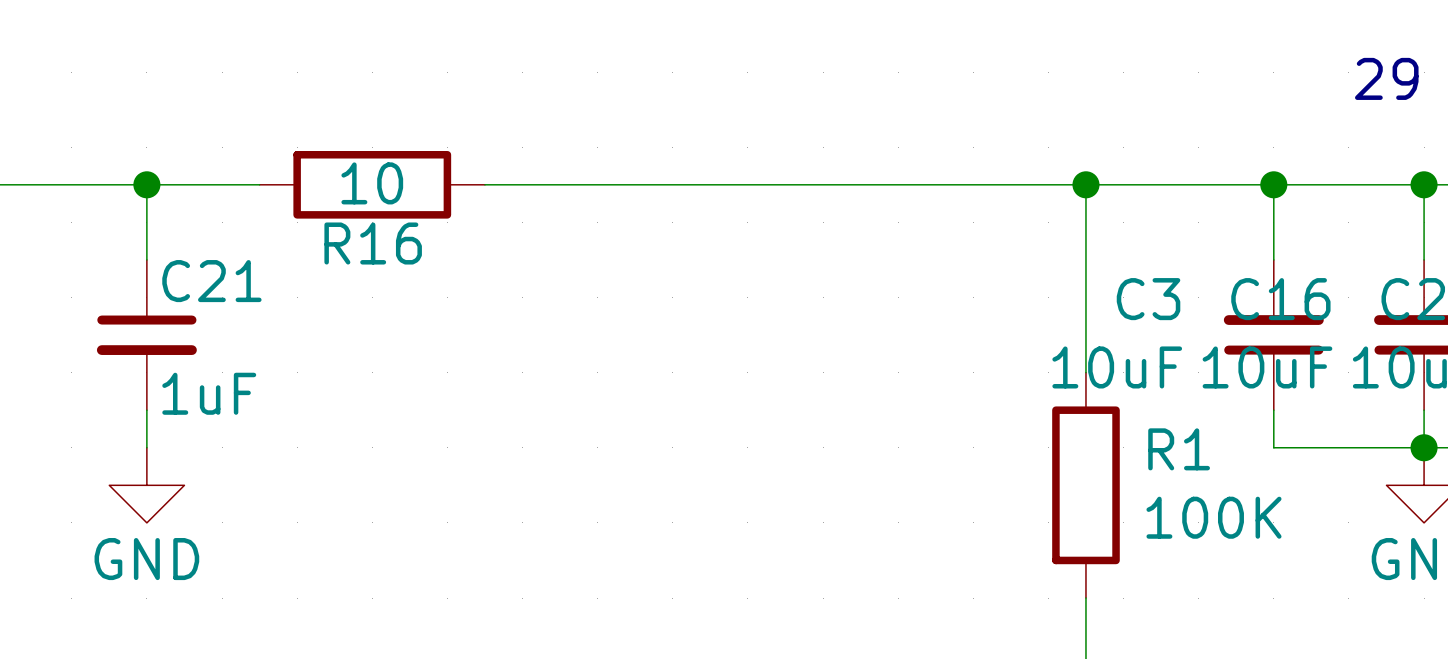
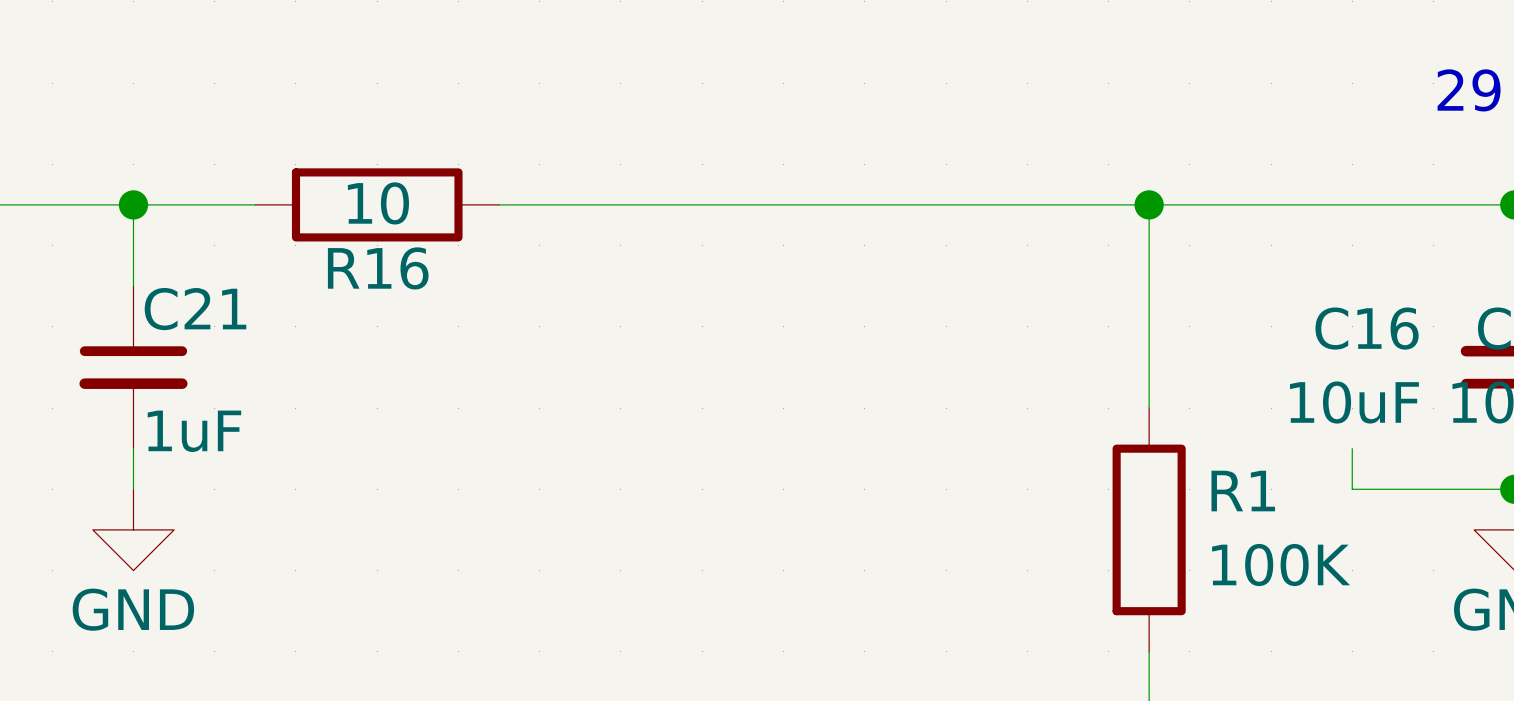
wire: (1273, 184) (1273, 259) -> none
junction: (1273, 184) -> none
C3: 10uF (1273, 335) -> none

